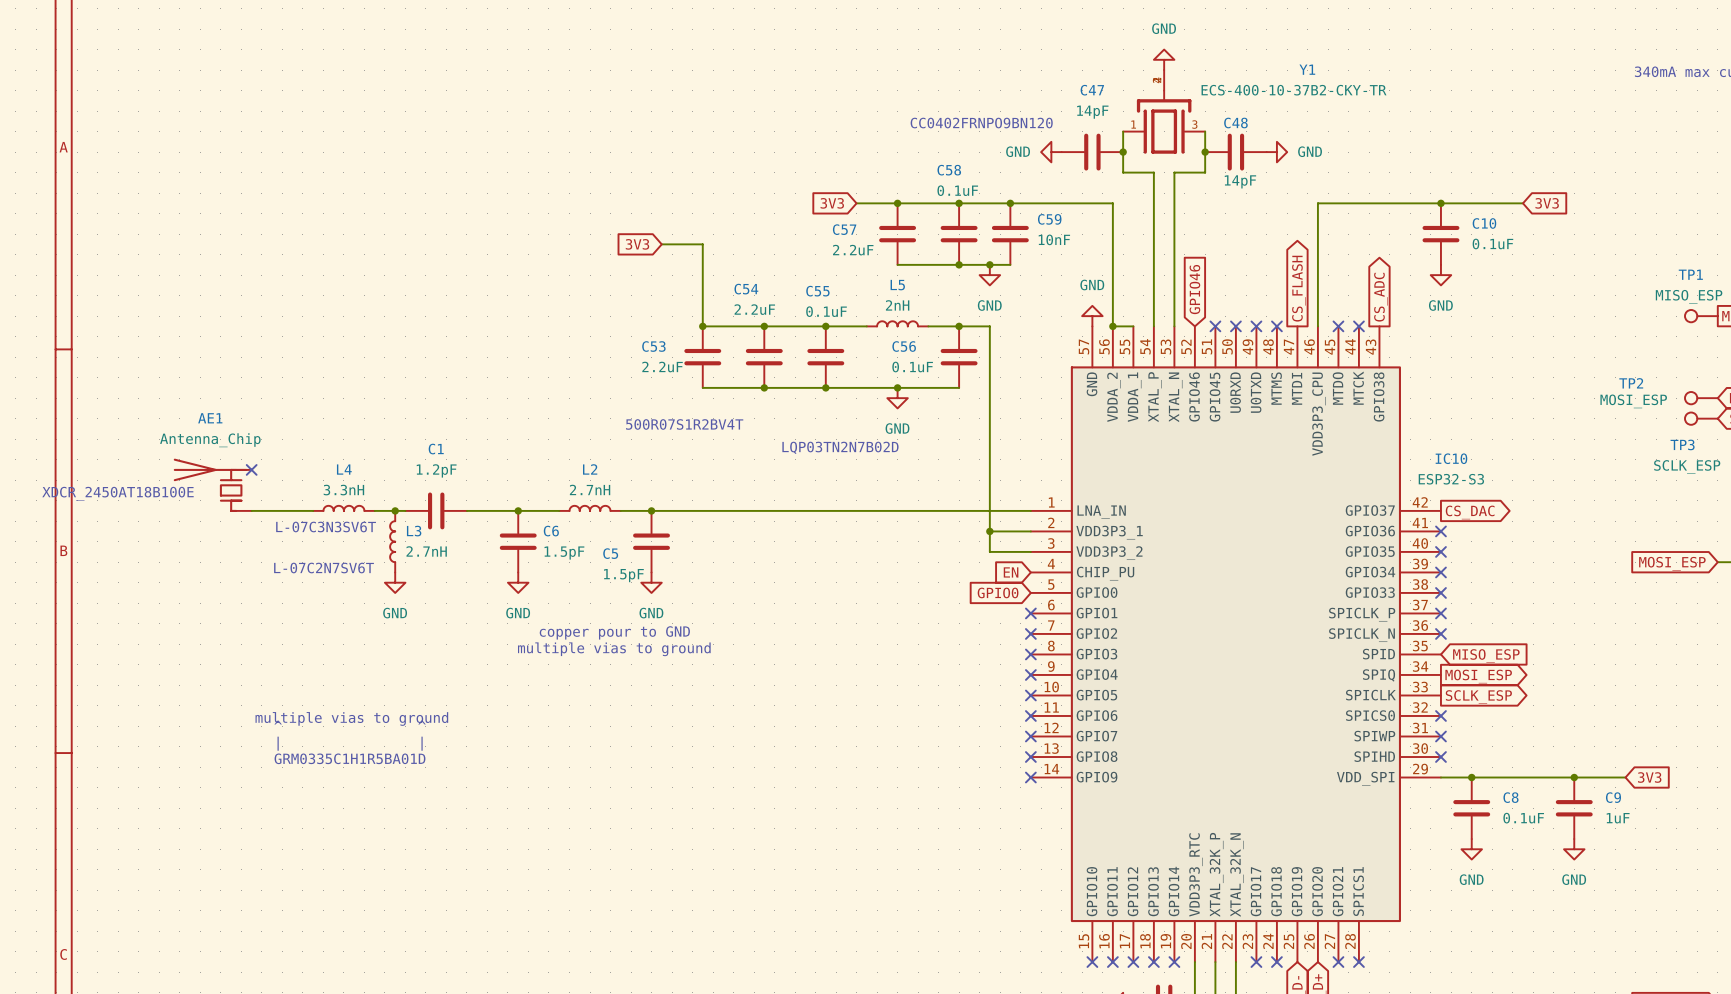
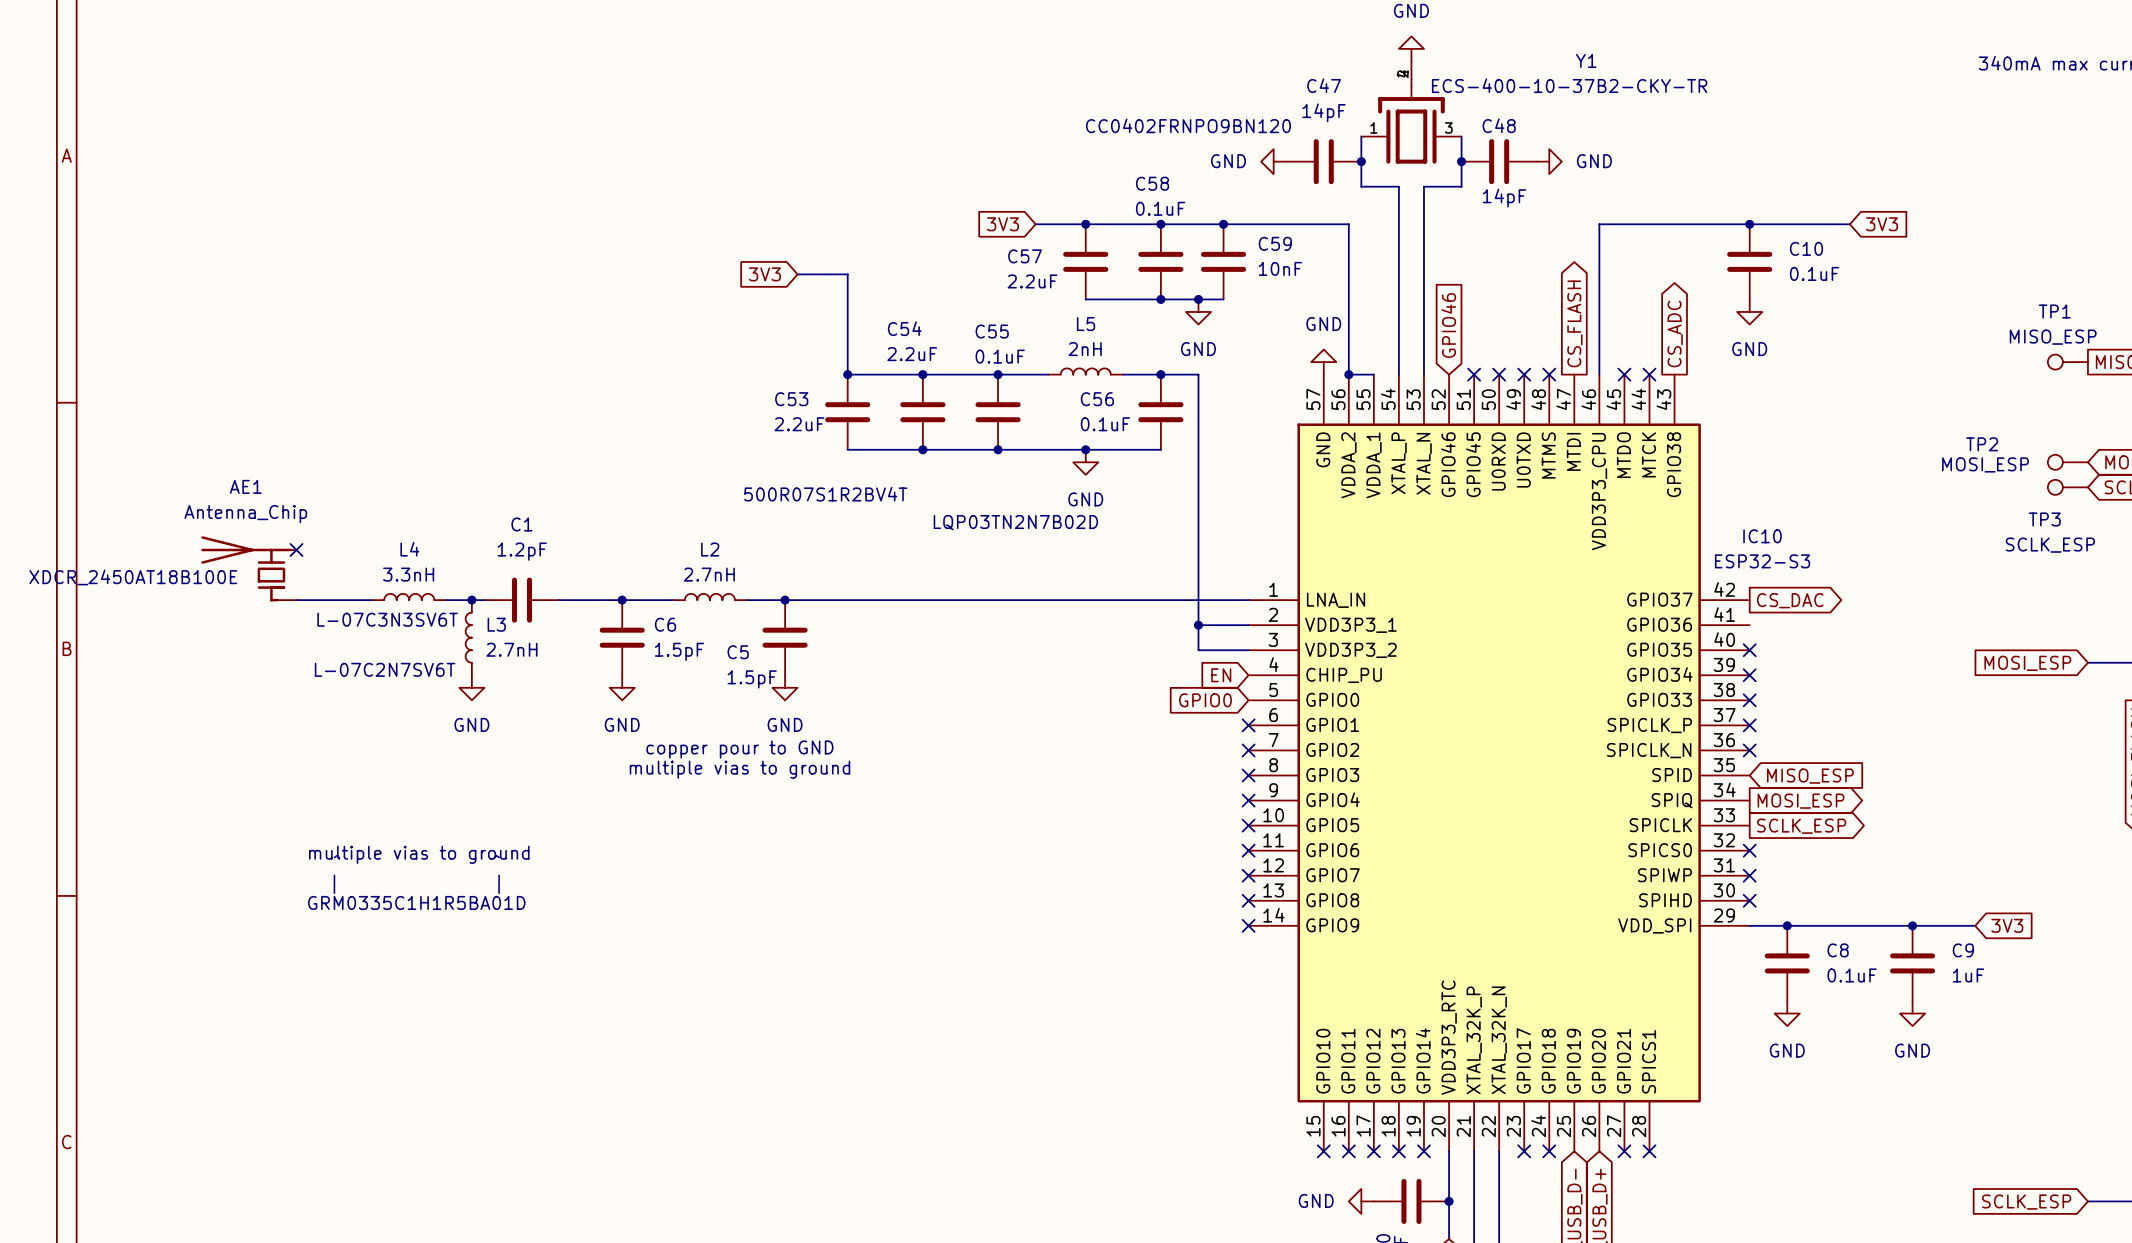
no-connect mark: (1440, 531) -> none

